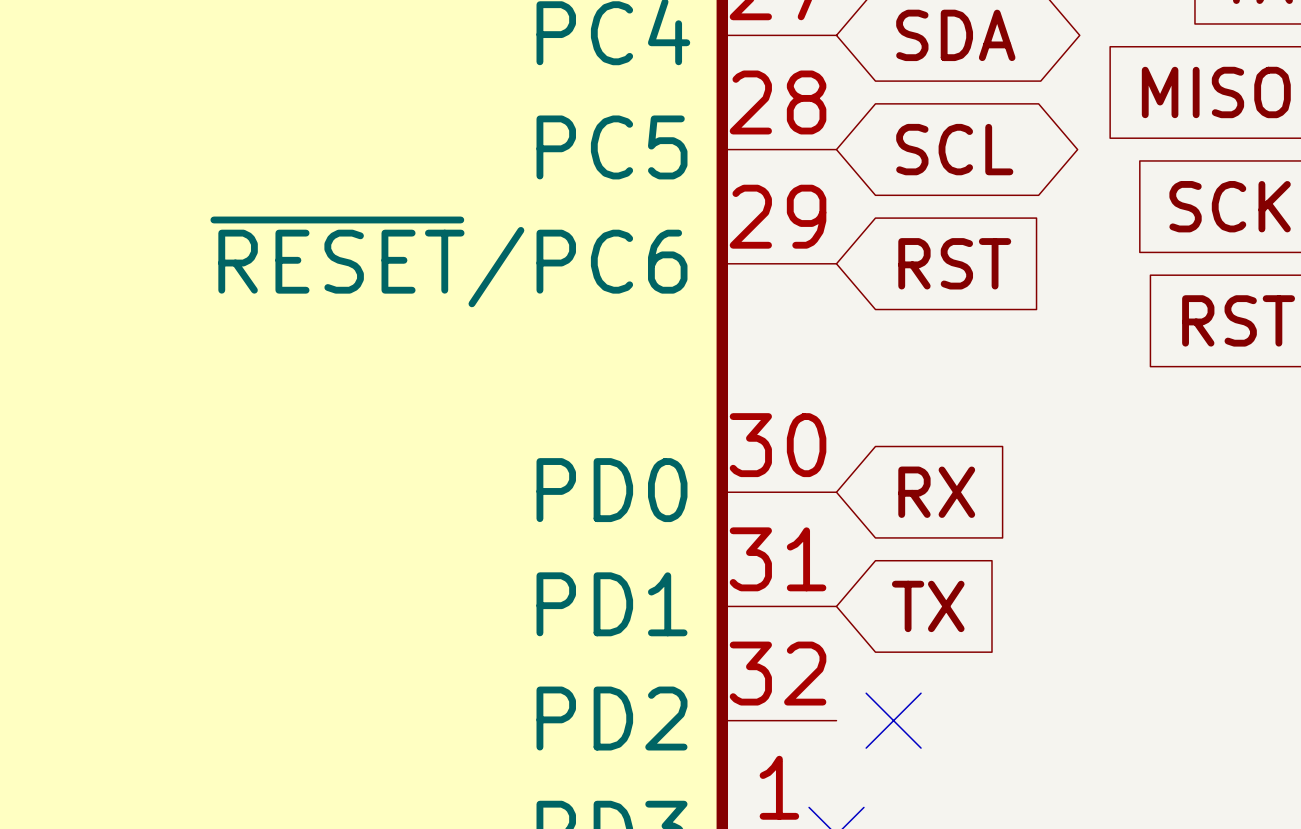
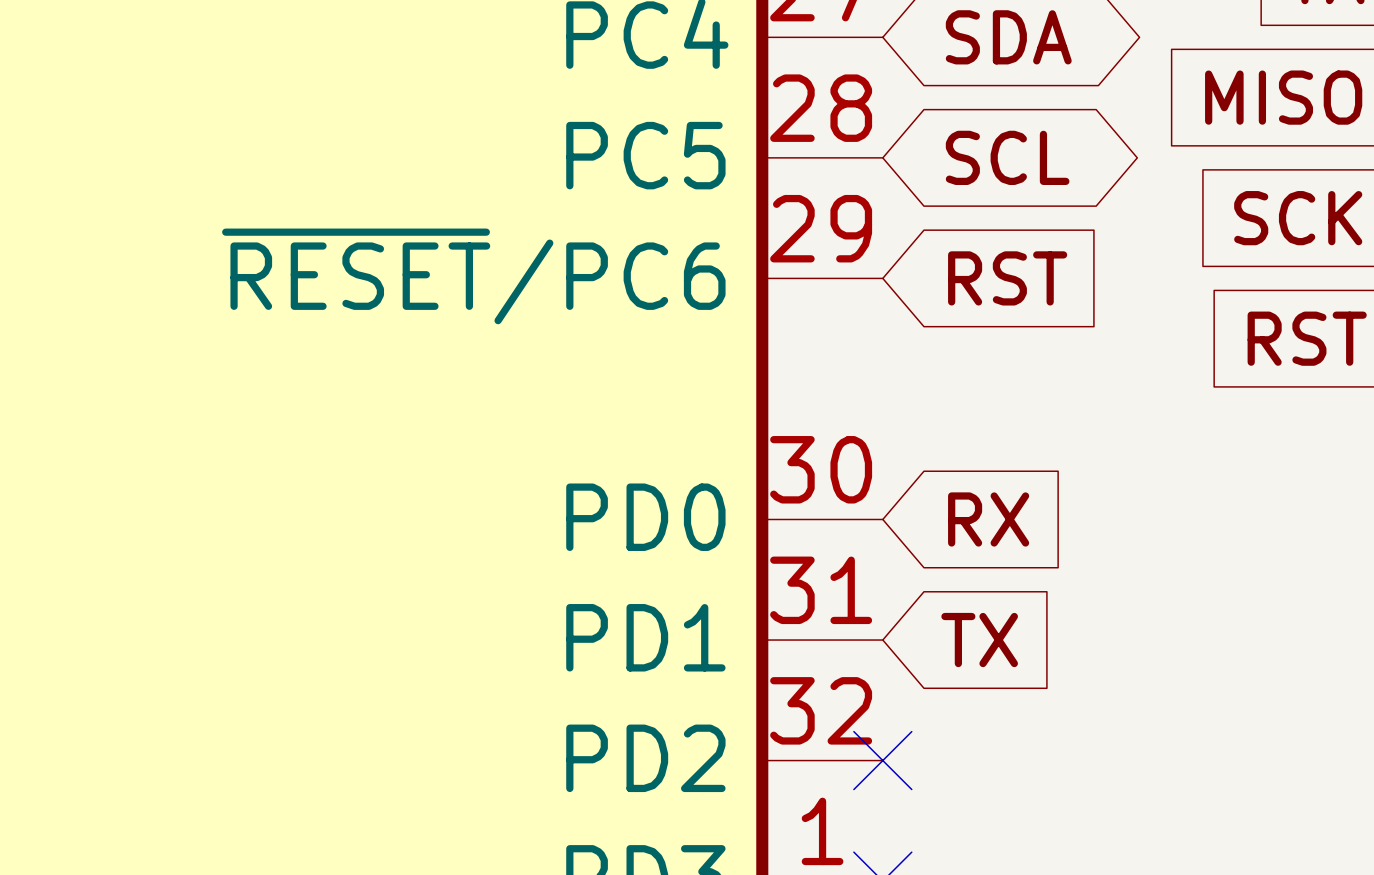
no-connect mark position: (893, 720) -> (882, 760)

